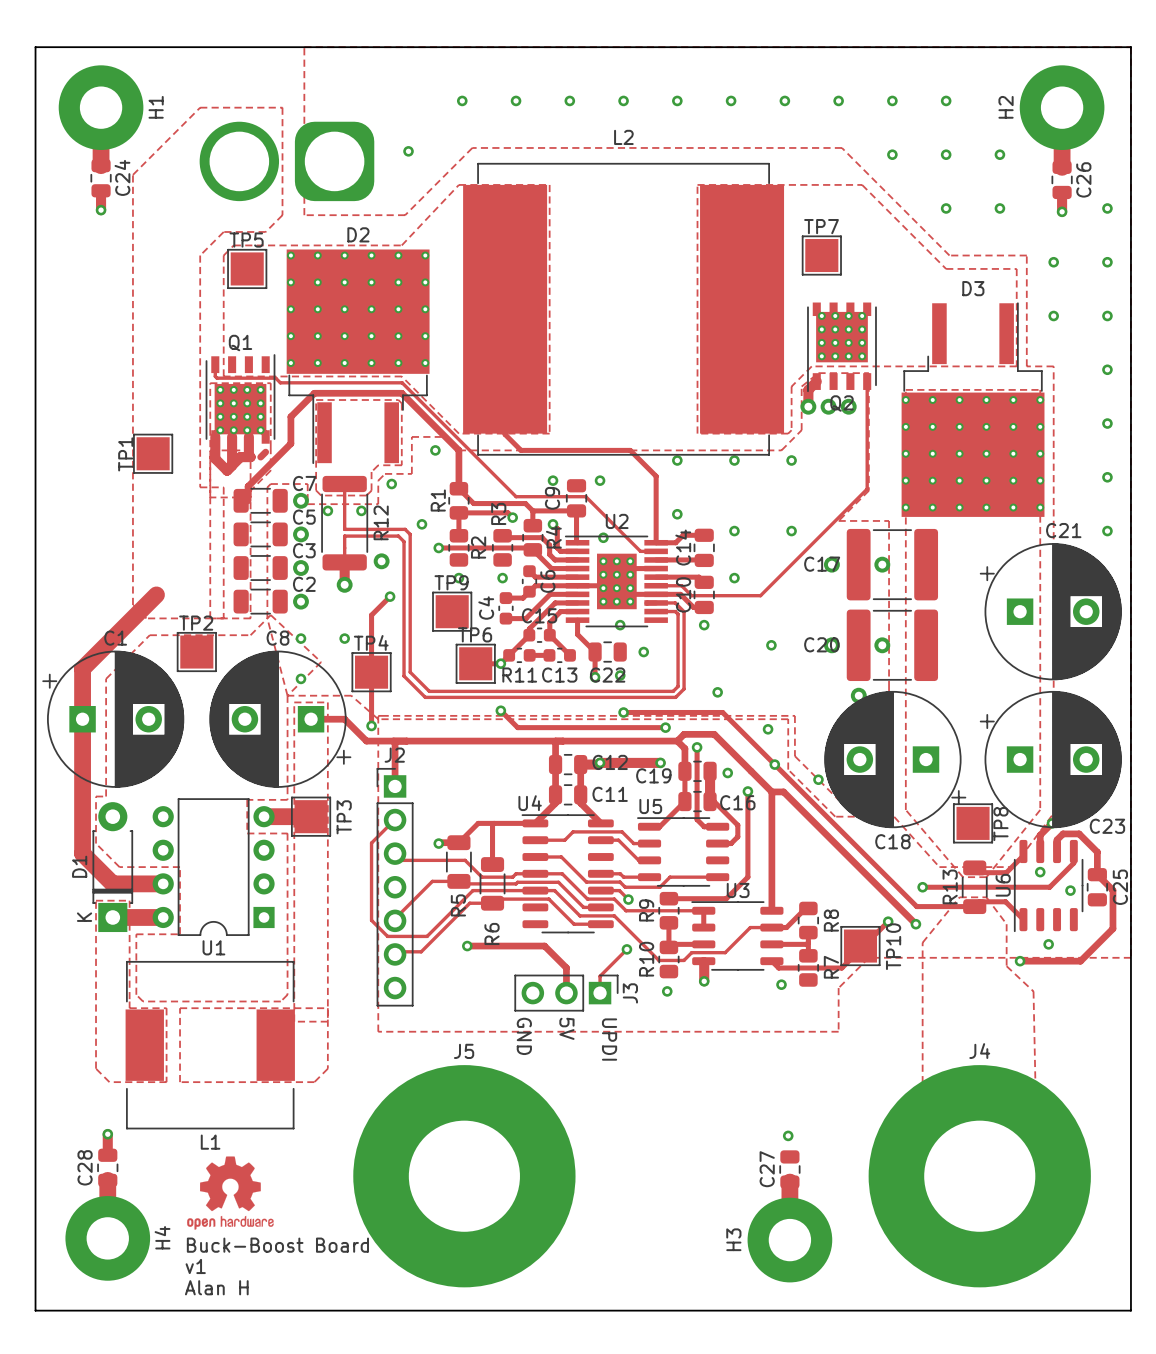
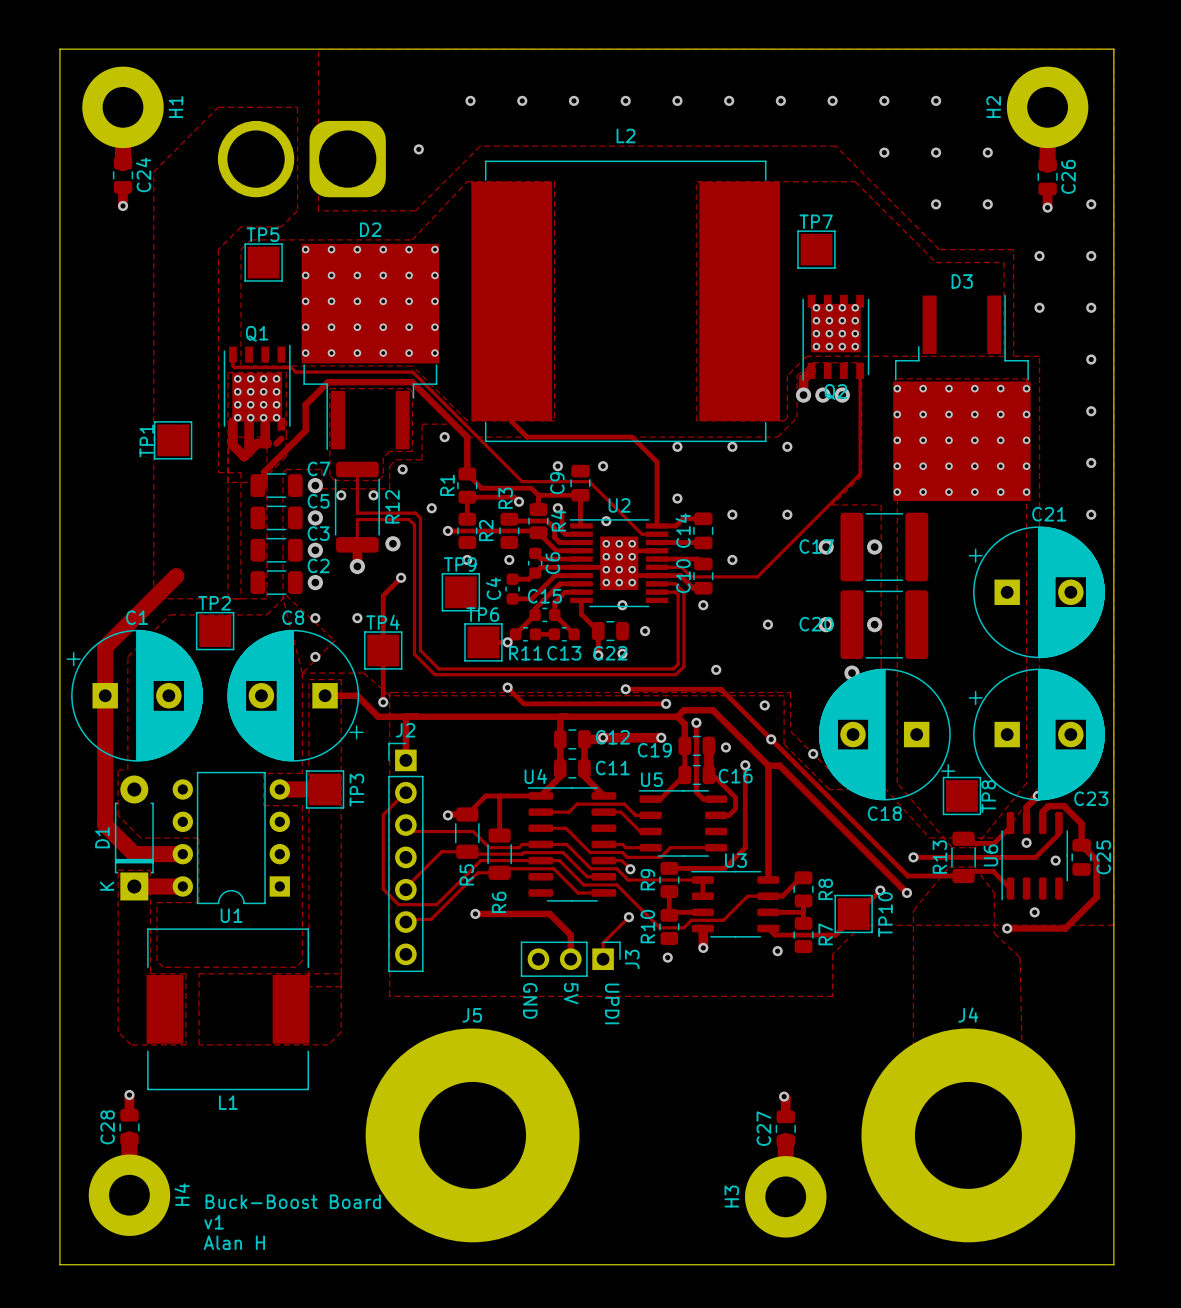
track: none -> (784, 1096) (785, 1116)
drawing: [187, 1156, 274, 1230] -> none

